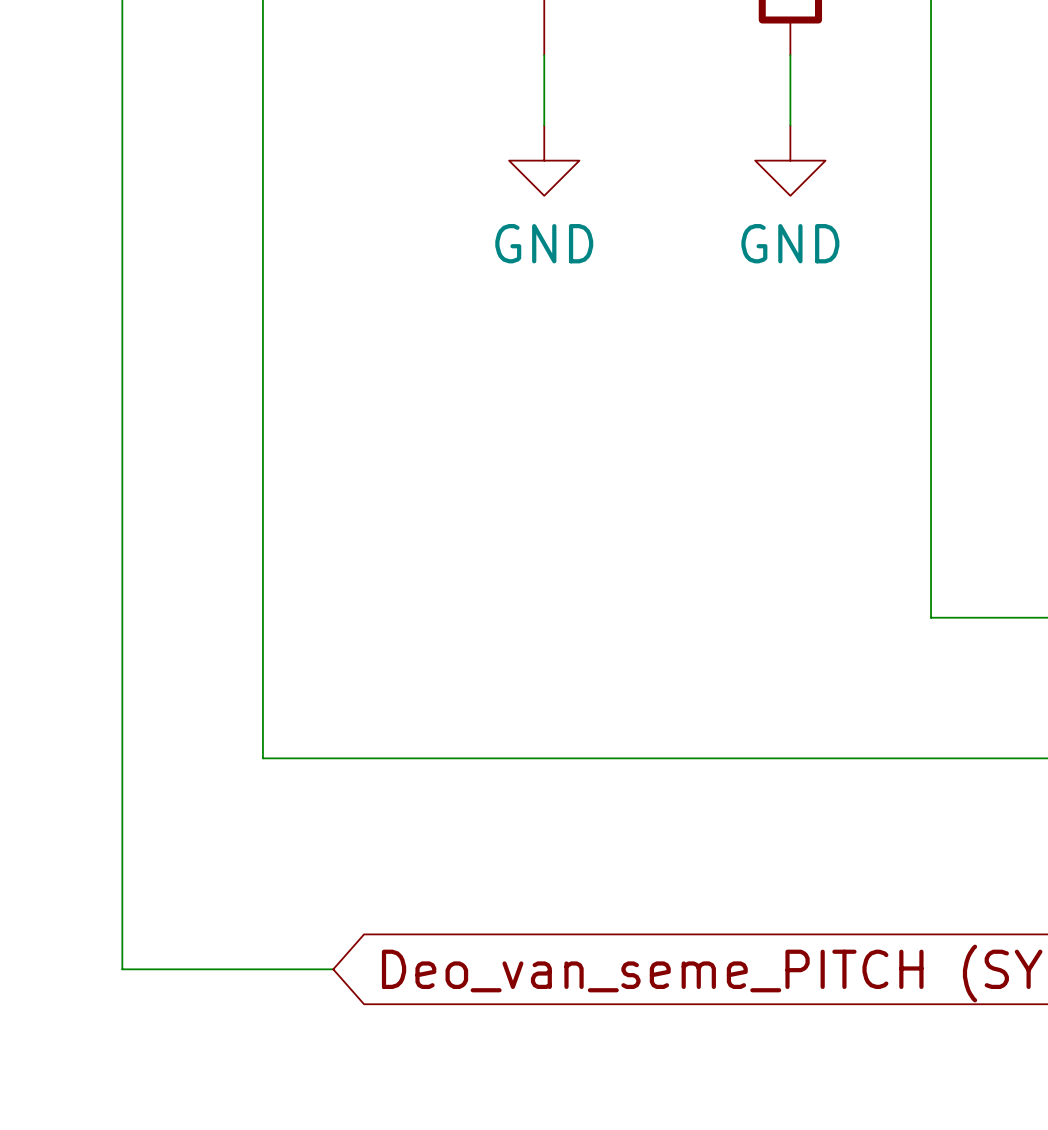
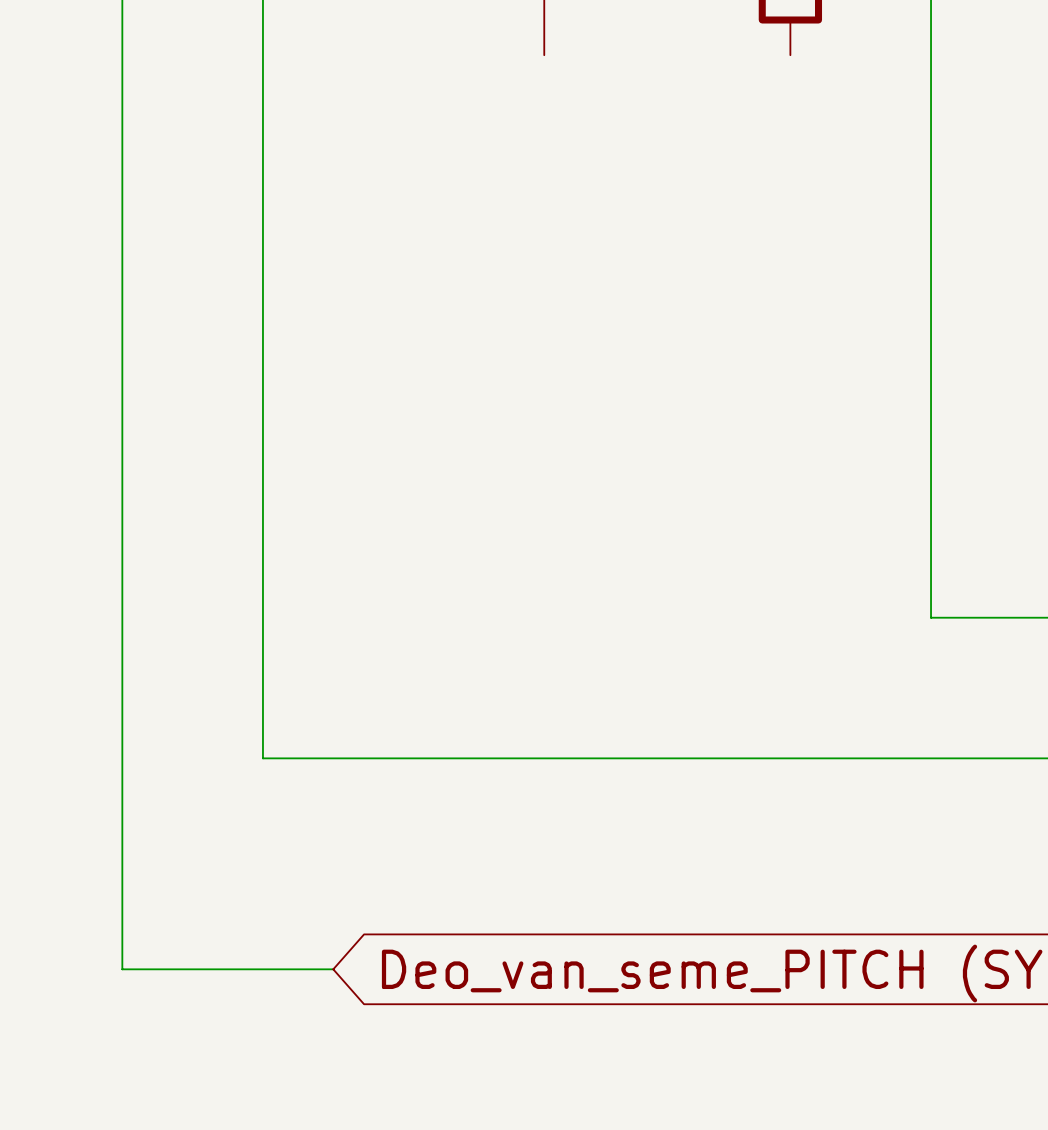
wire: (544, 55) (544, 125) -> none
wire: (790, 55) (790, 125) -> none
power symbol: GND (544, 160) -> none
power symbol: GND (790, 160) -> none

